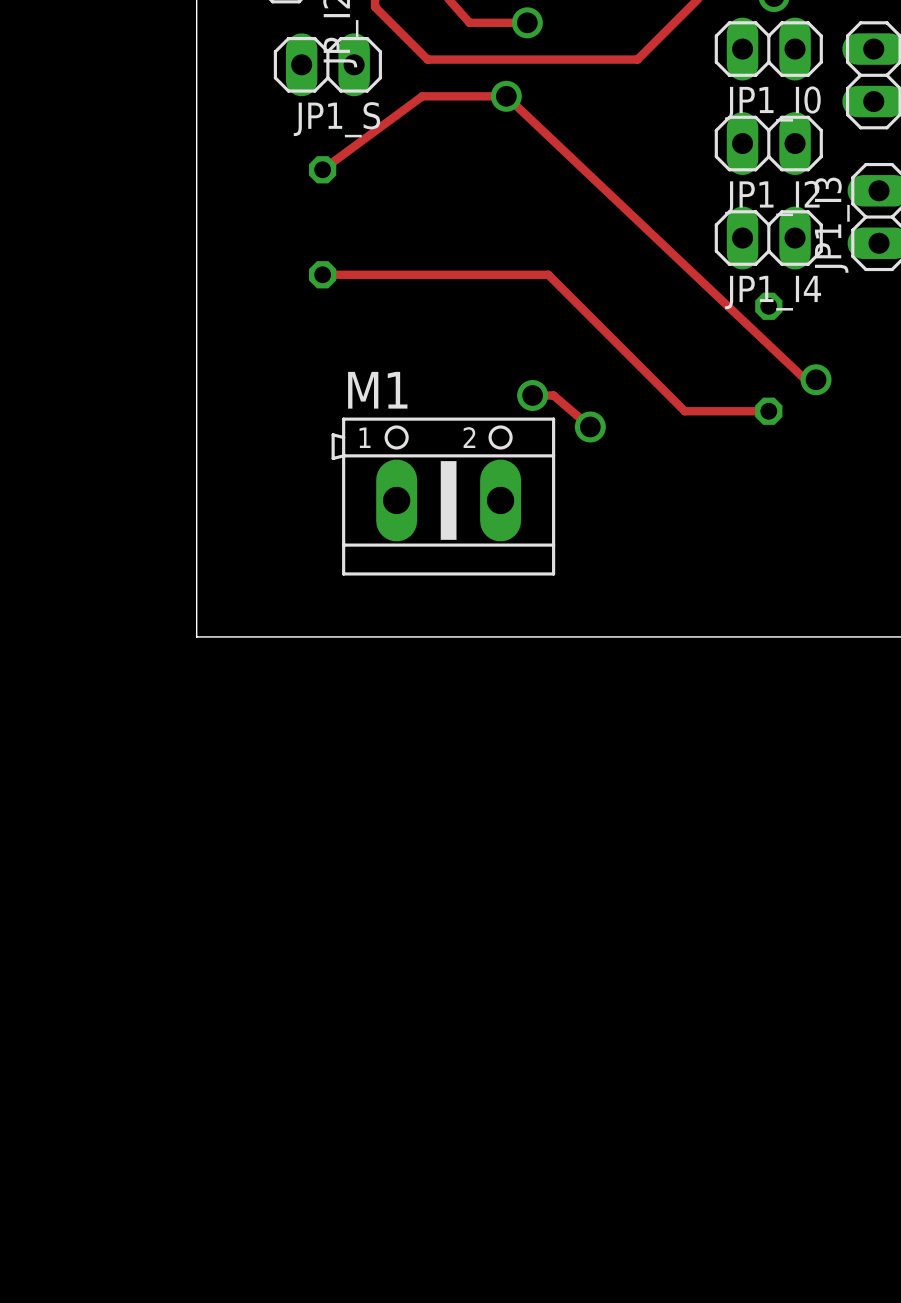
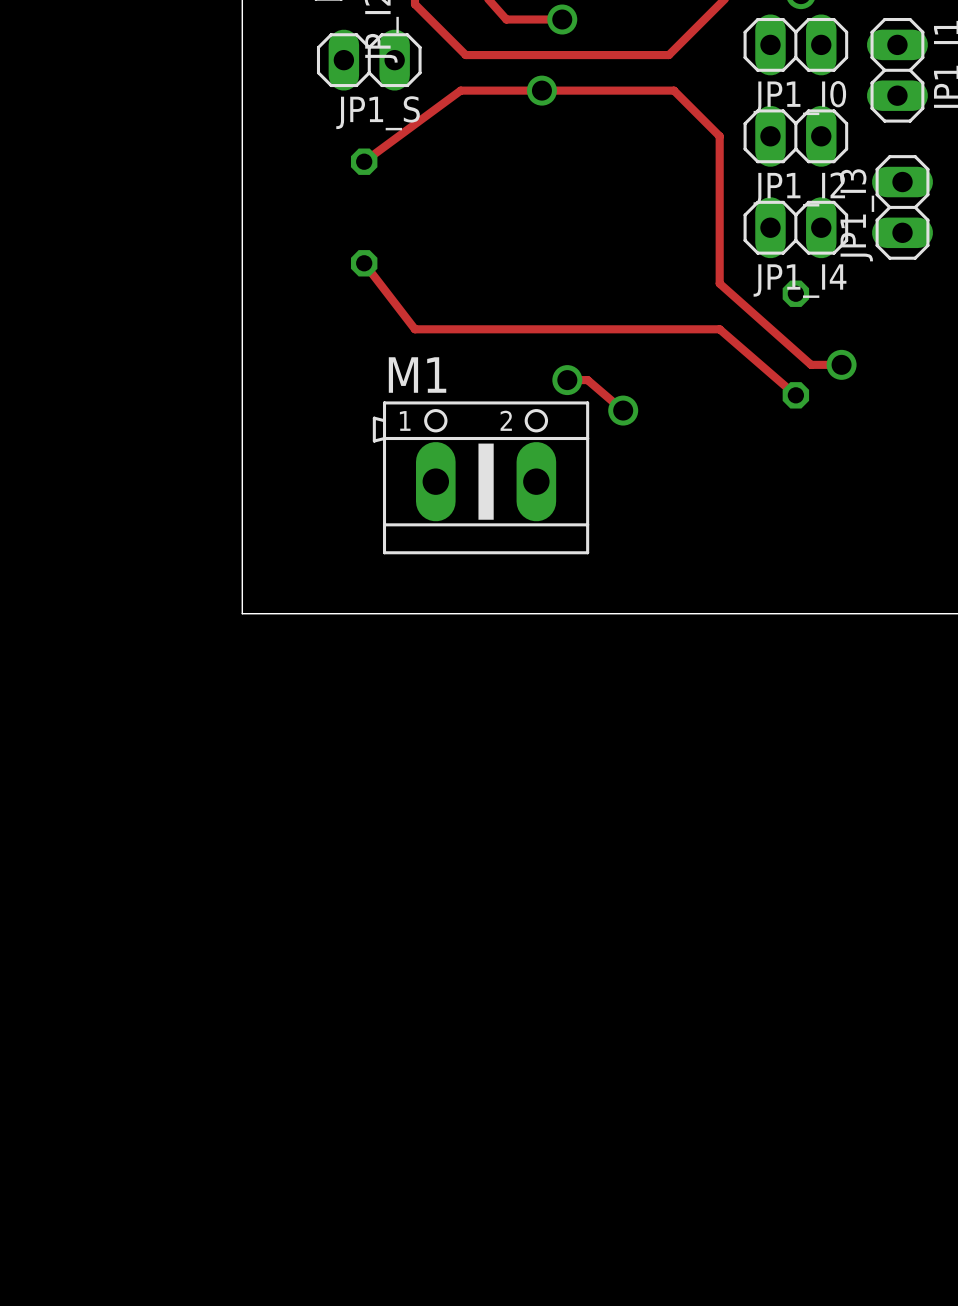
track: (506, 96) (805, 379) -> (541, 90) (673, 90) (719, 136) (719, 283) (811, 364) (831, 364)
track: (322, 274) (548, 274) (684, 411) (768, 411) -> (364, 263) (414, 329) (719, 329) (795, 395)

